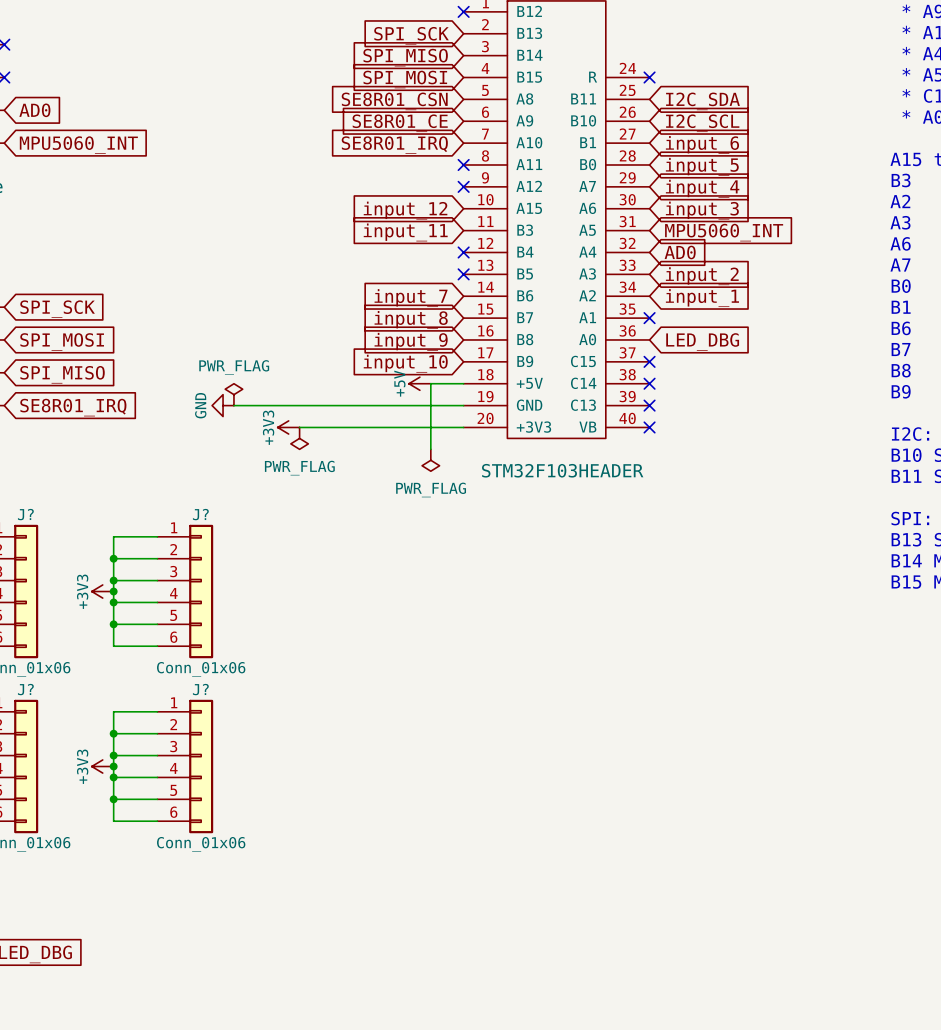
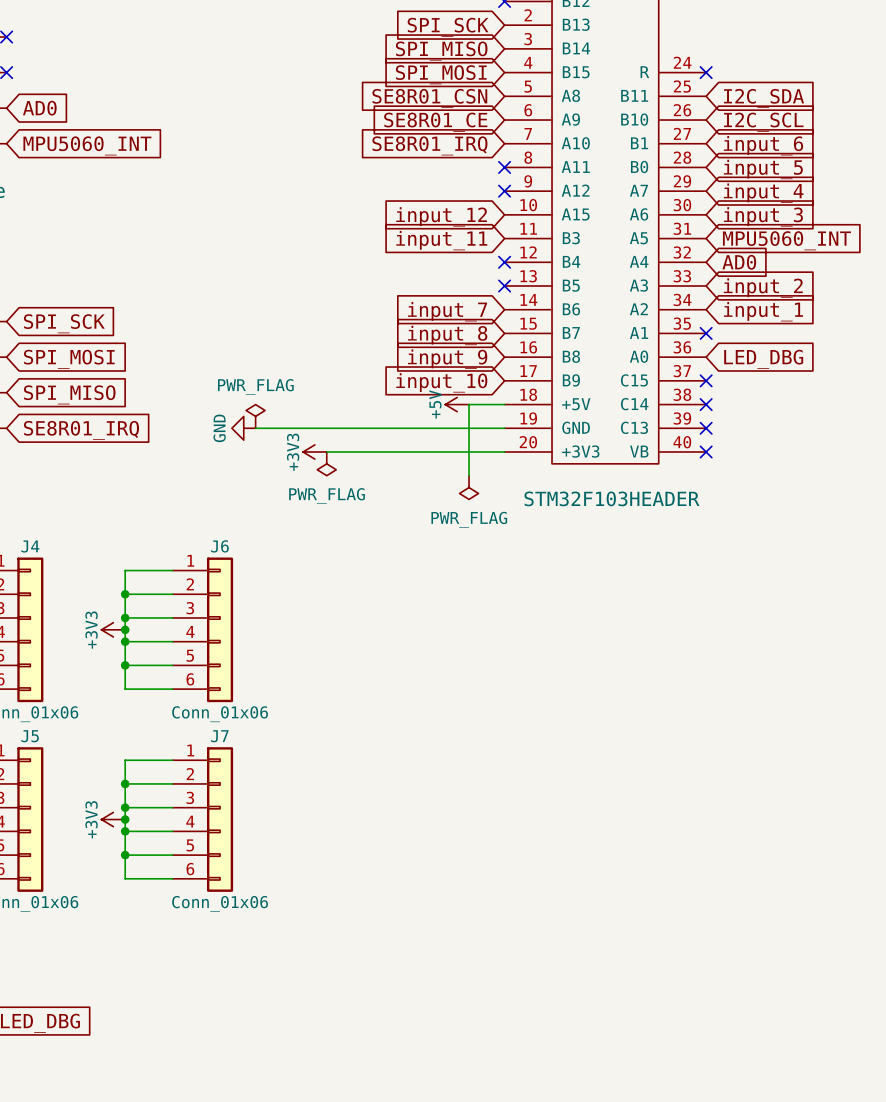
J? name: J? (25, 514) -> J4 (30, 546)
J? name: J? (200, 514) -> J6 (219, 546)
J? name: J? (25, 689) -> J5 (30, 736)
J? name: J? (200, 689) -> J7 (219, 736)

